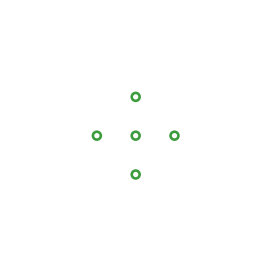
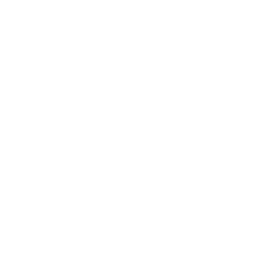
part: (135, 135) -> none

